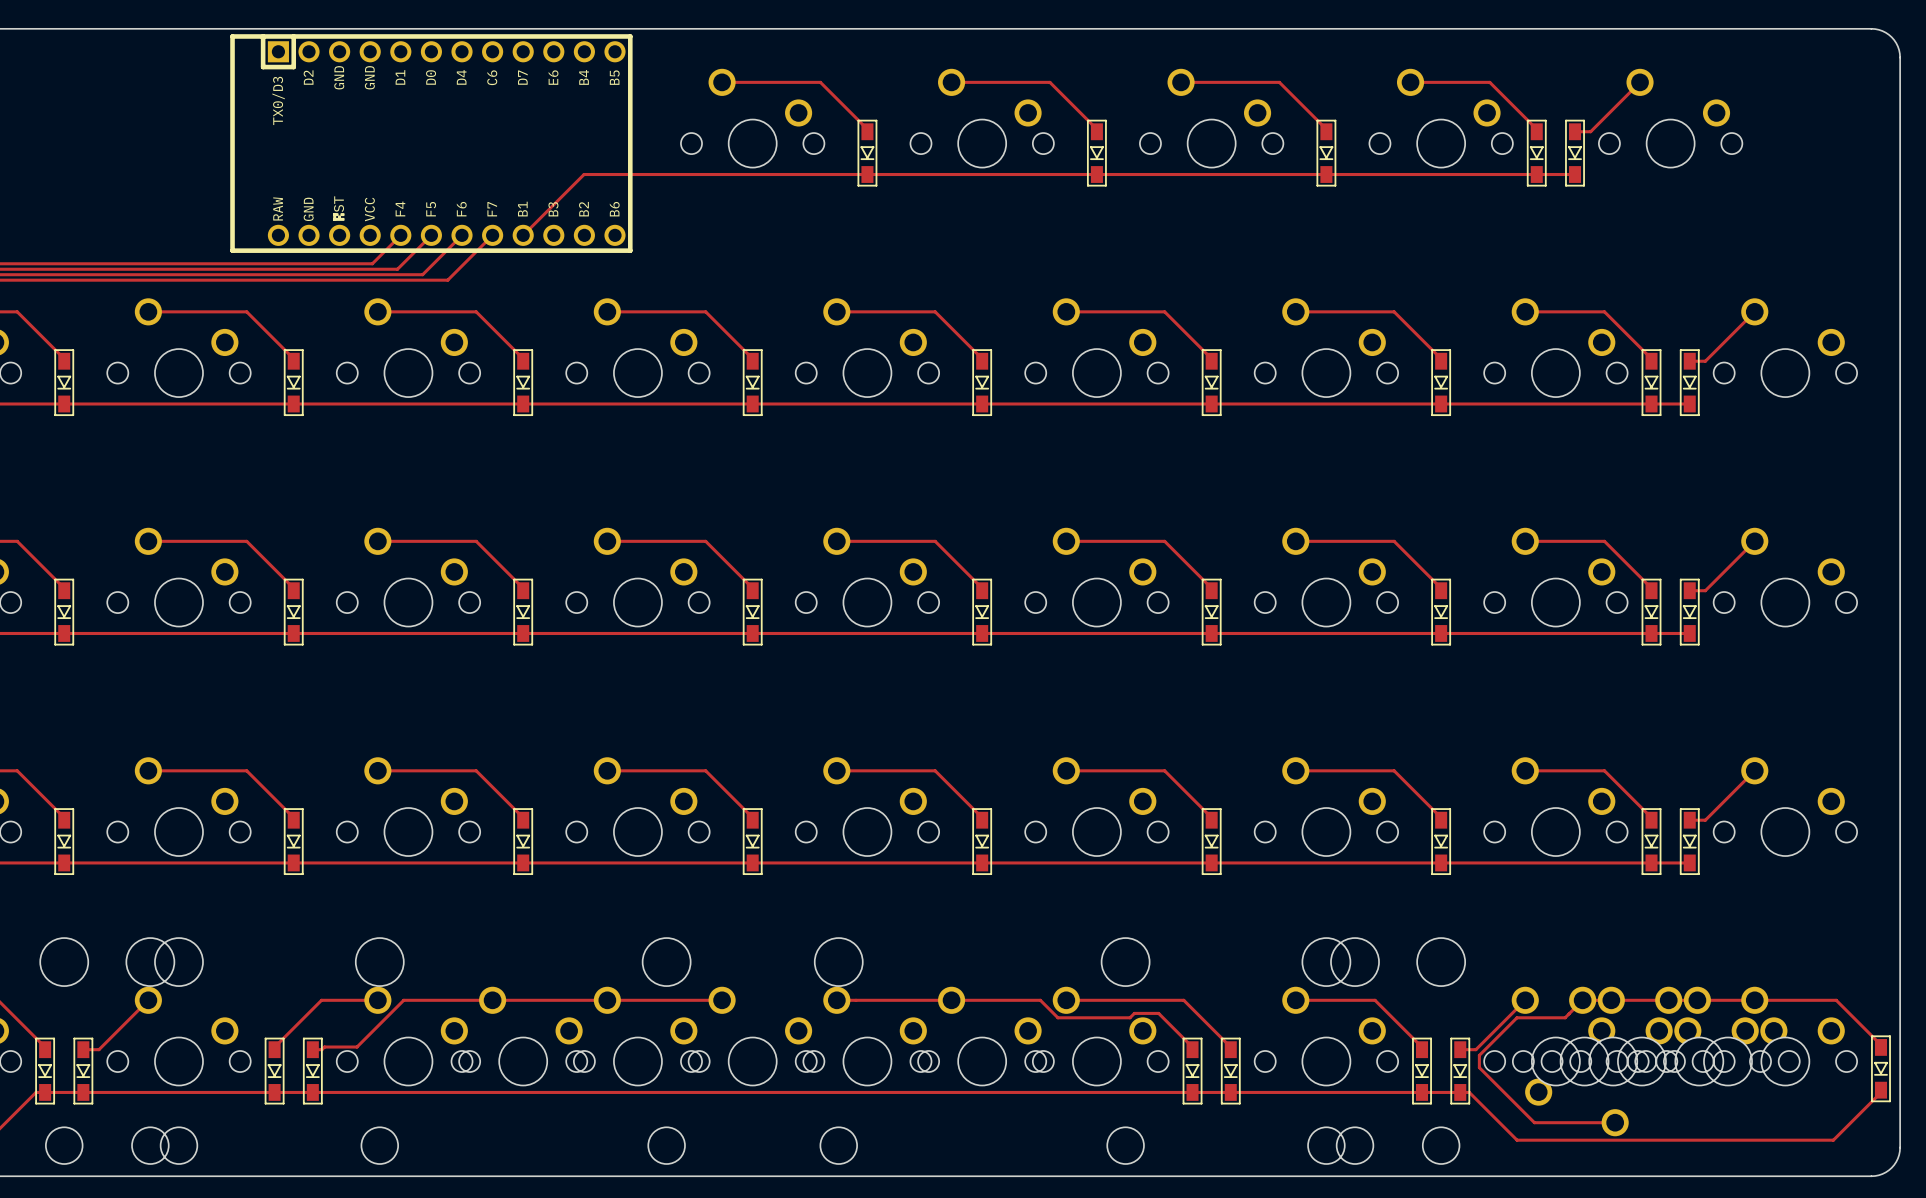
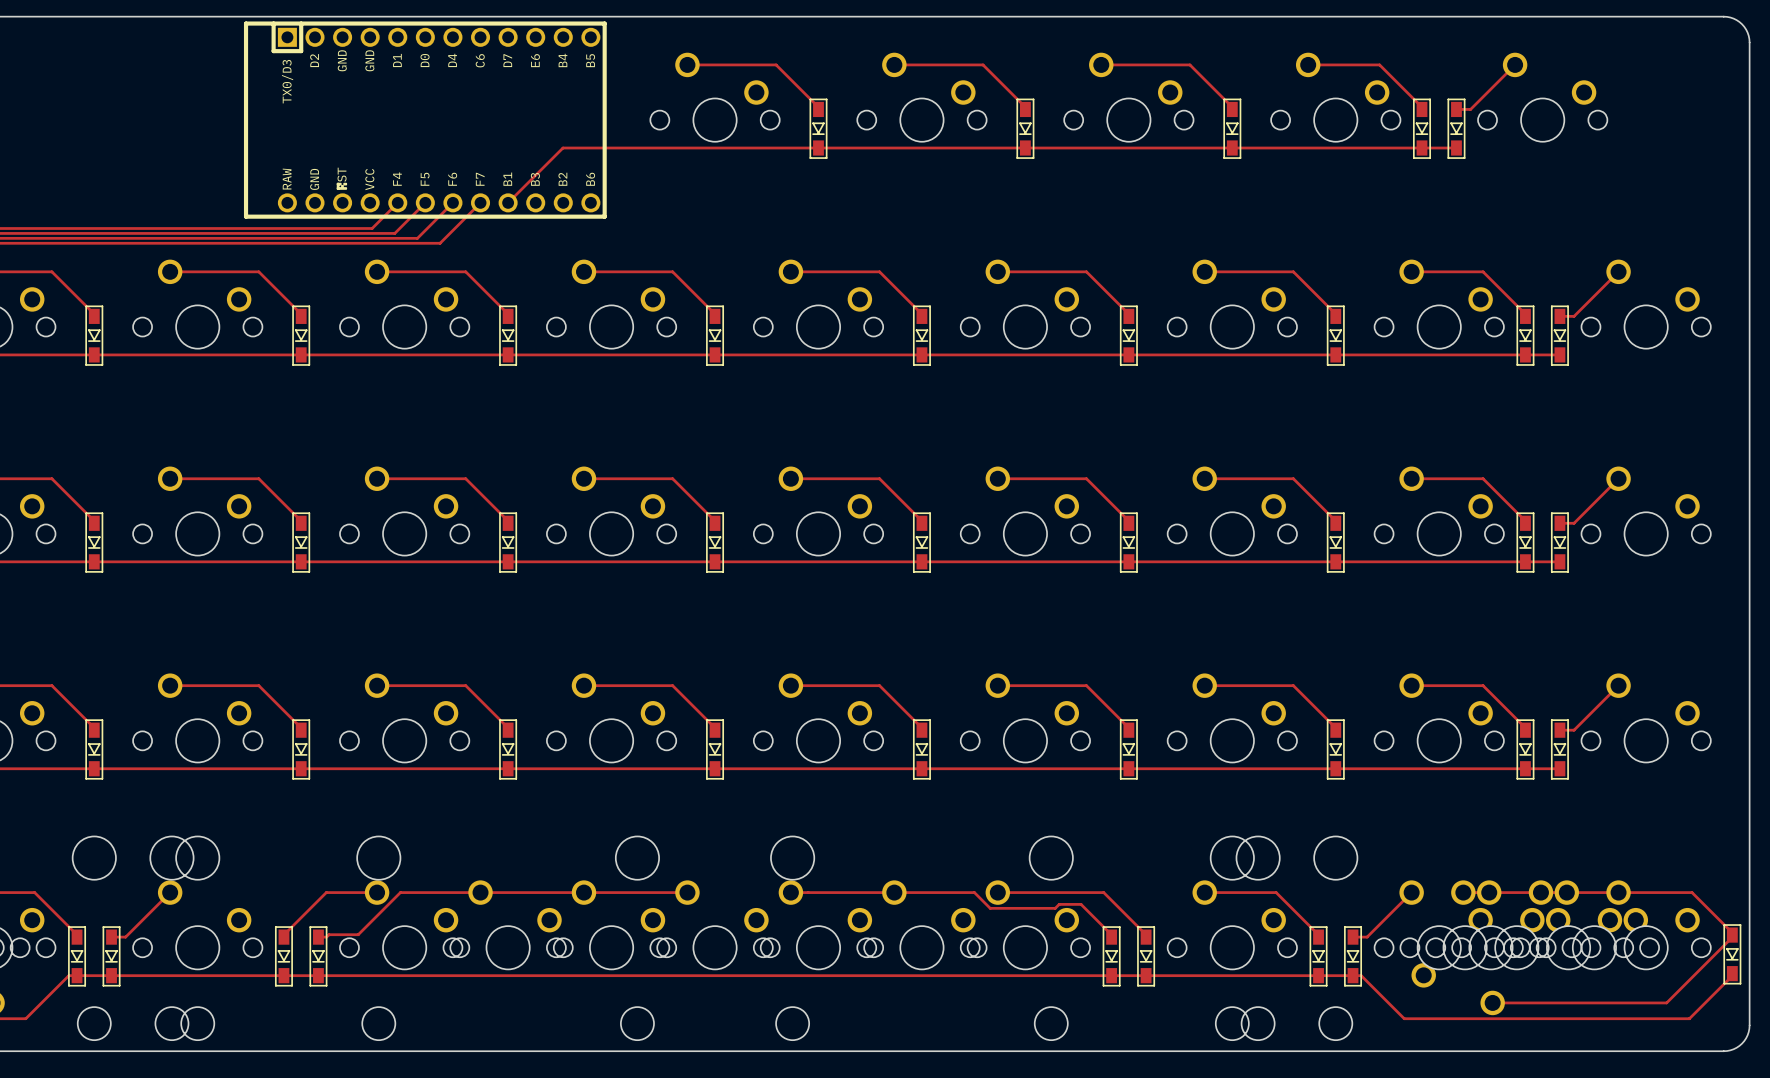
track: (1582, 1000) (1565, 1017) (1516, 1017) (1479, 1055) (1479, 1067) (1534, 1122) (1615, 1122) -> (1732, 935) (1732, 937) (1666, 1002) (1492, 1002)

